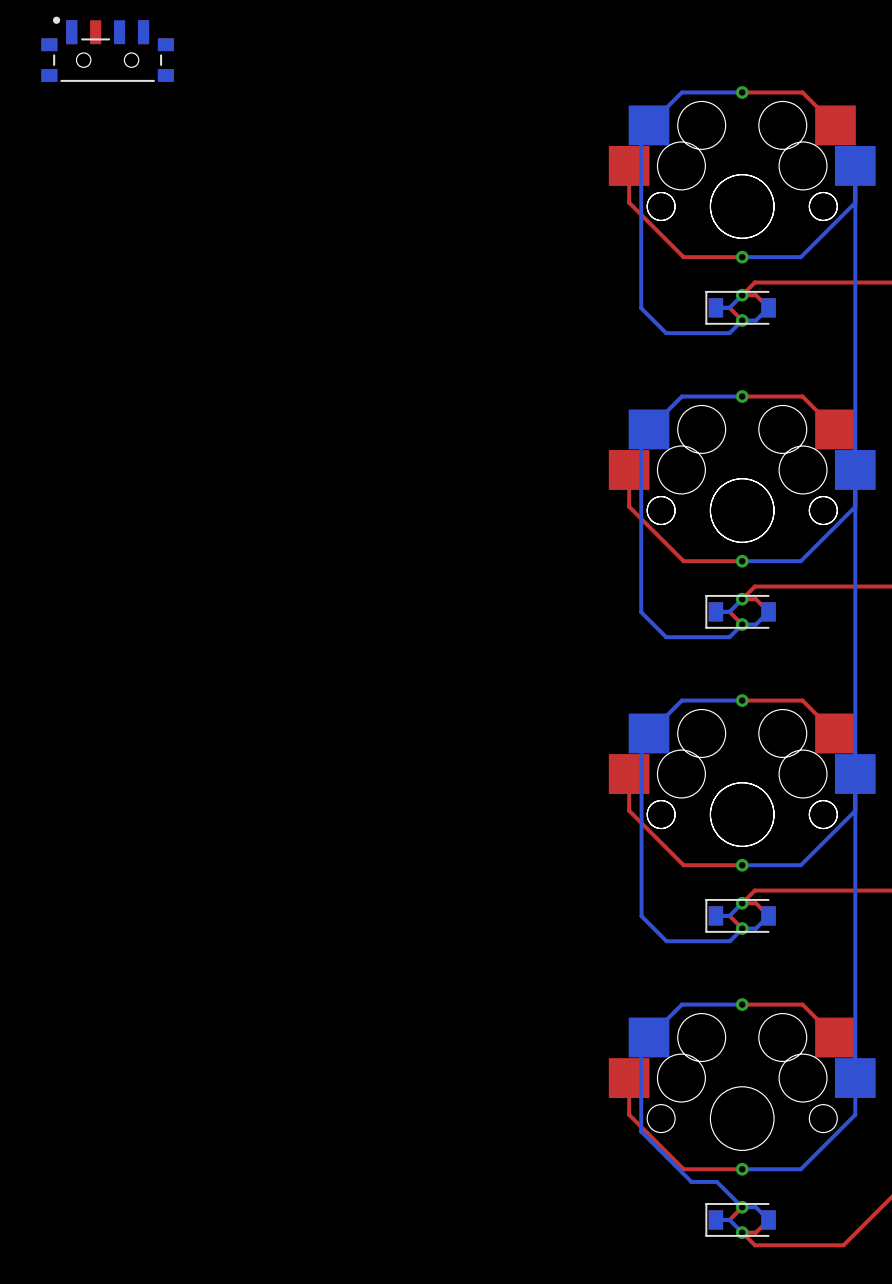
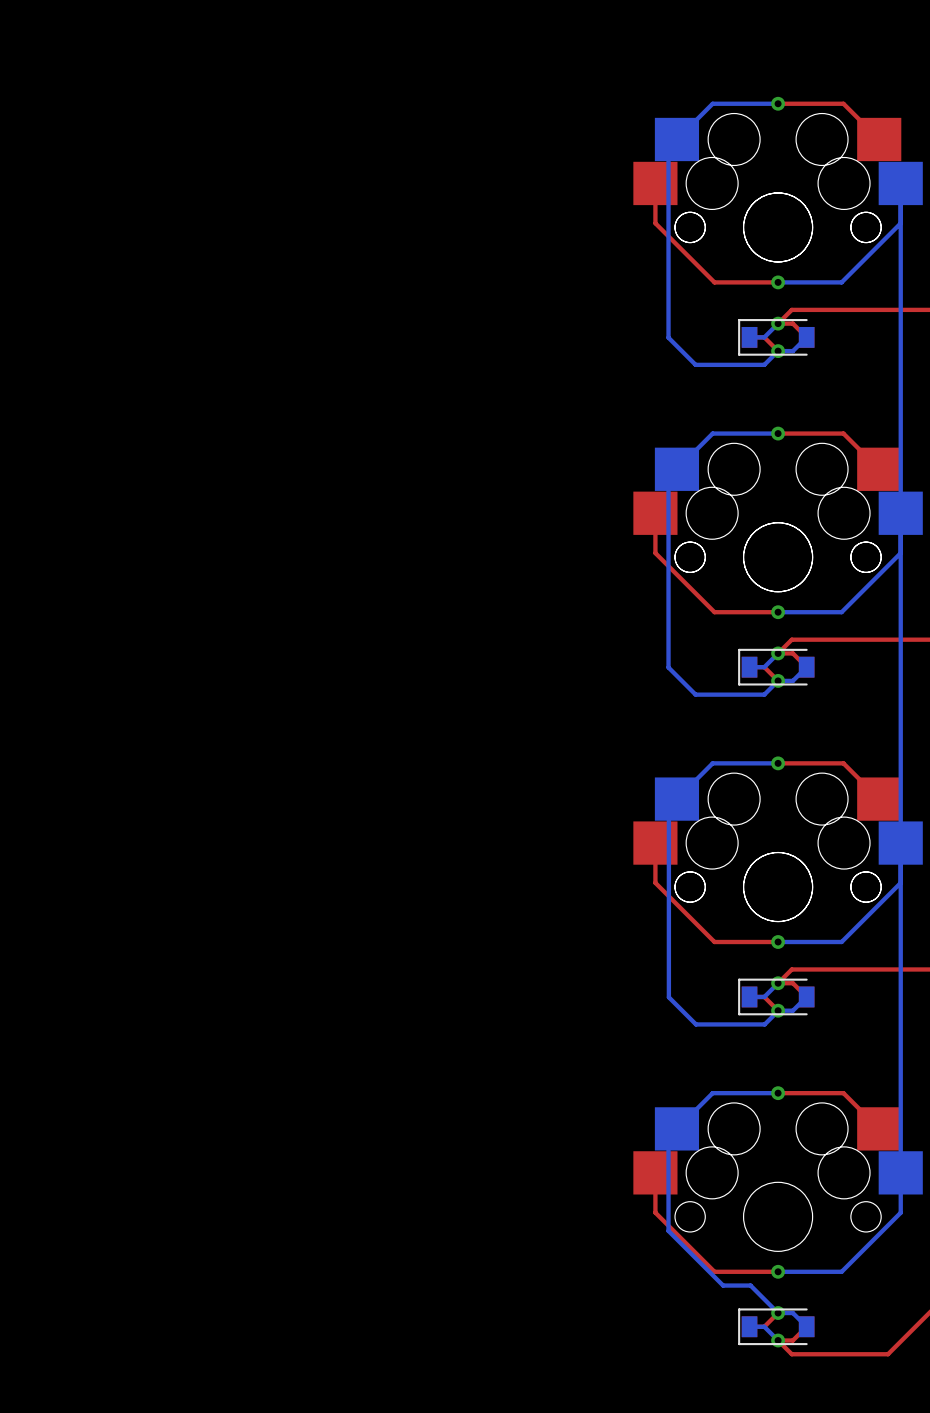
part: (107, 49) -> none

